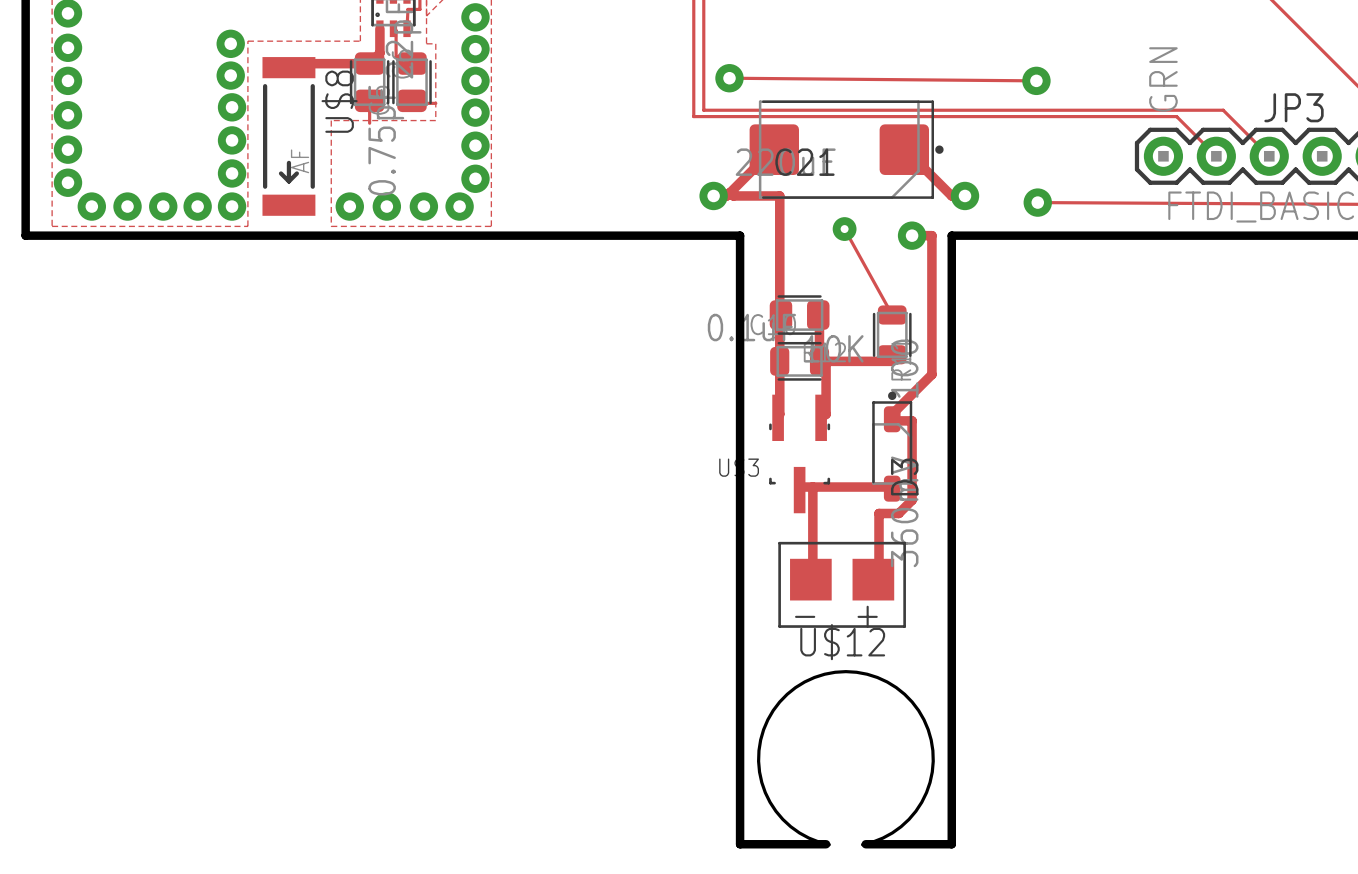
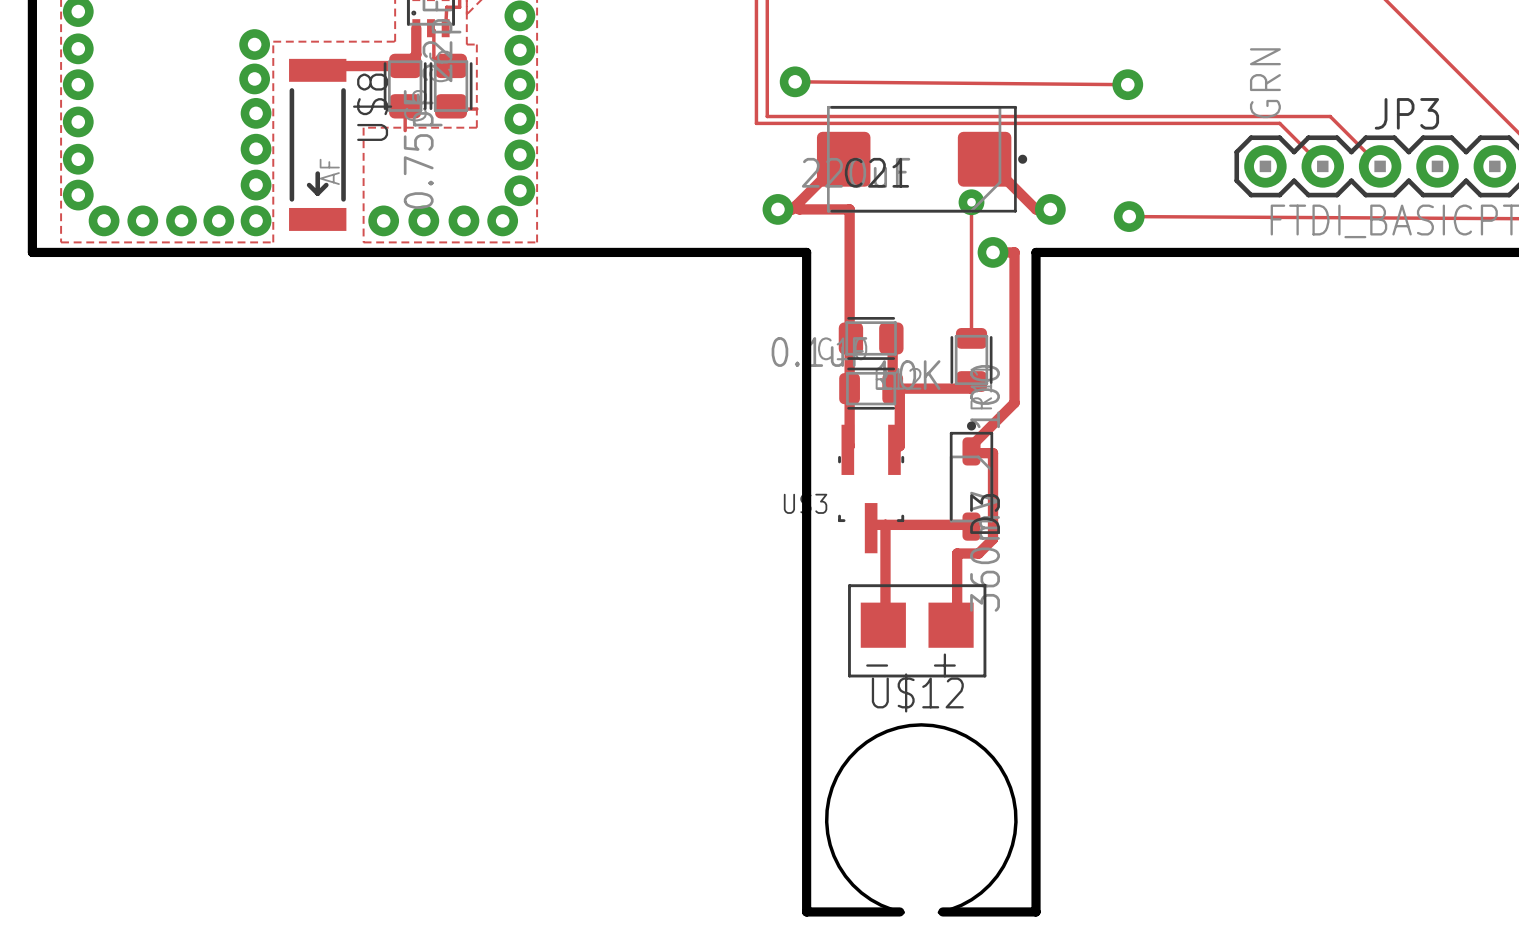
track: (844, 229) (892, 314) -> (971, 202) (971, 338)
via position: (844, 229) -> (971, 202)

